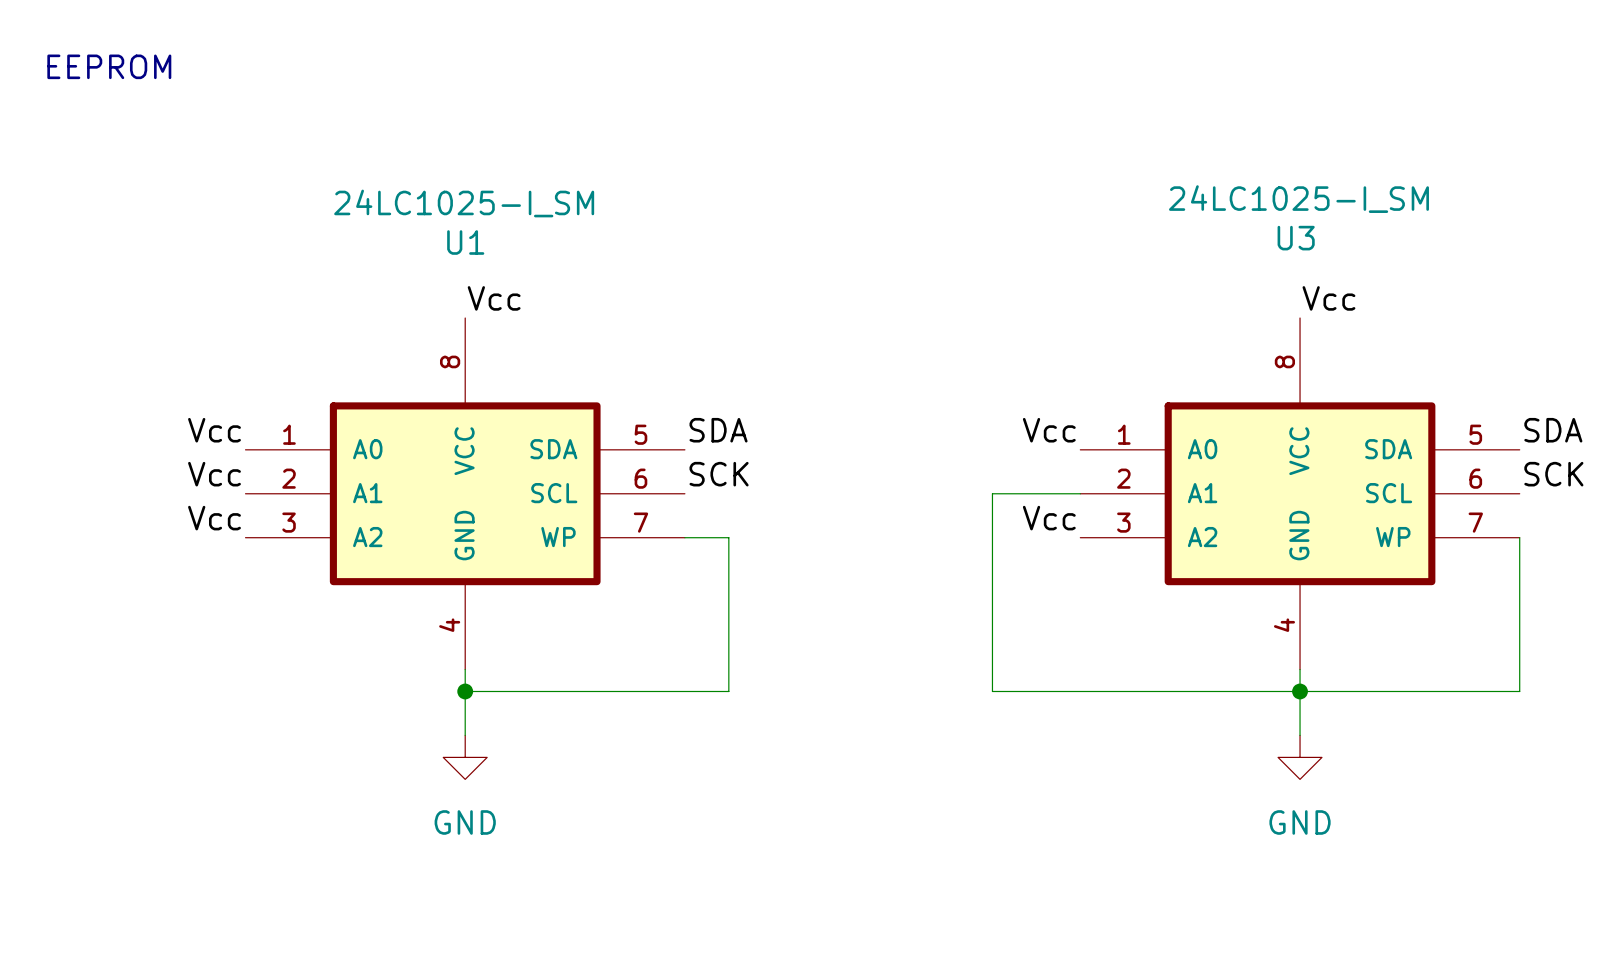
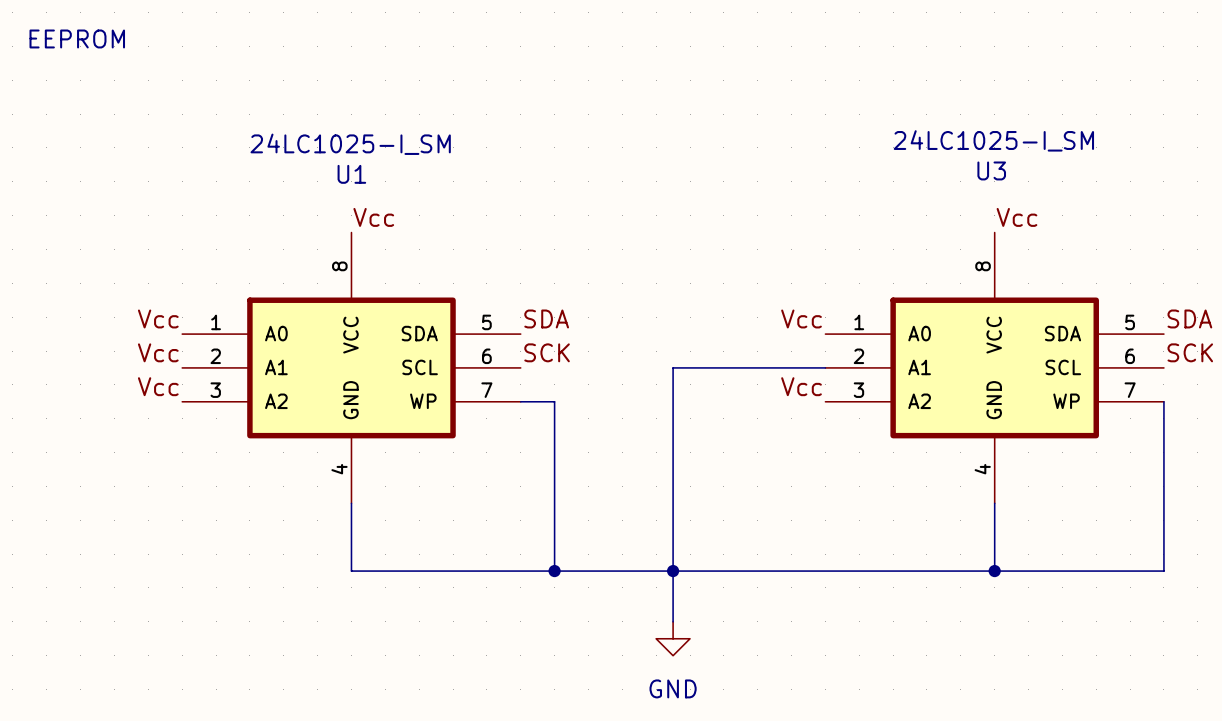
wire: (992, 493) (992, 691) (1519, 691) -> (351, 554) (351, 571) (1163, 571) (1163, 520)
wire: none -> (757, 367) (673, 367) (673, 621)
wire: (465, 691) (728, 691) -> (554, 571) (554, 520)
junction: (465, 691) -> none
junction position: (1300, 691) -> (994, 571)
power symbol: GND (465, 757) -> none
junction: none -> (554, 571)
junction: none -> (673, 571)
power symbol: GND (1300, 757) -> none
power symbol: none -> GND (673, 638)

